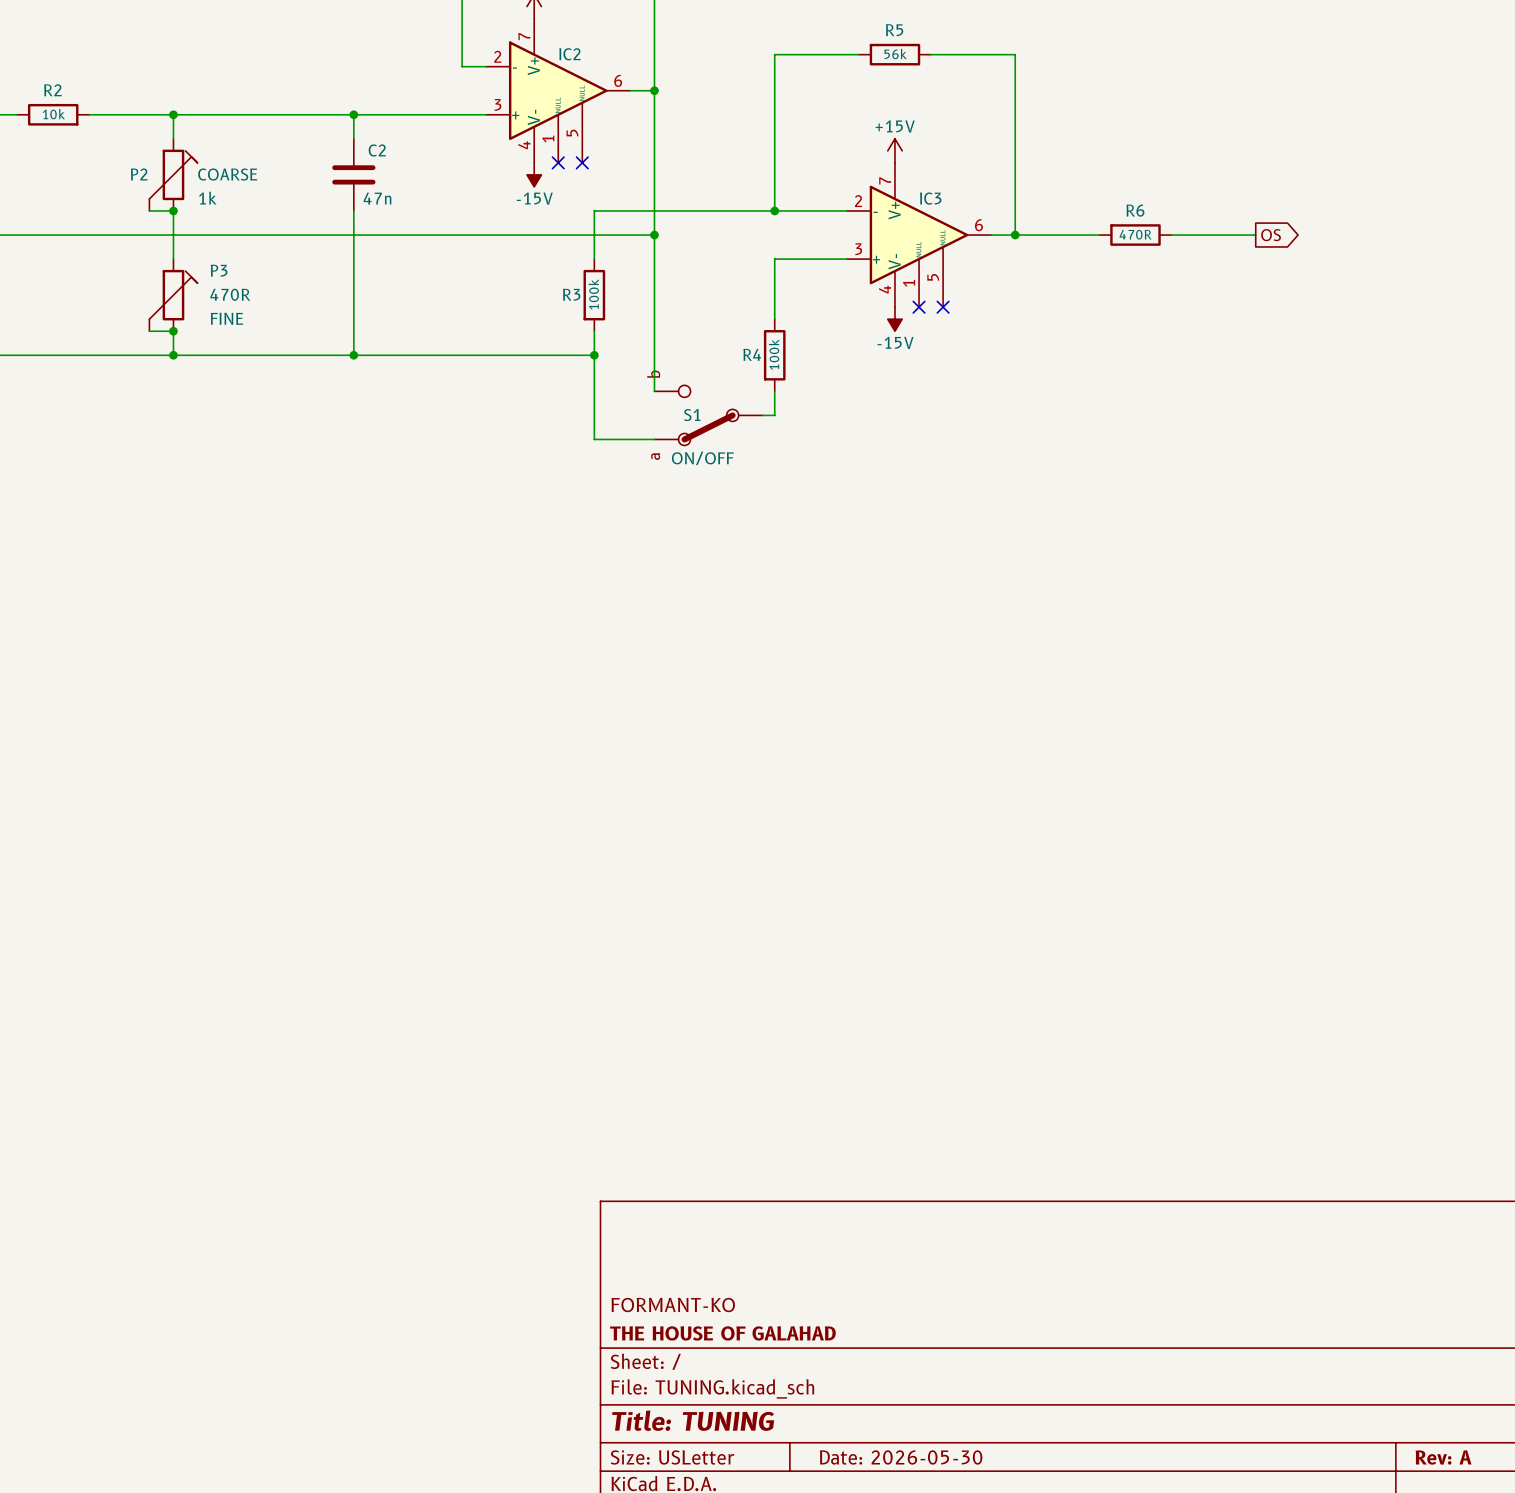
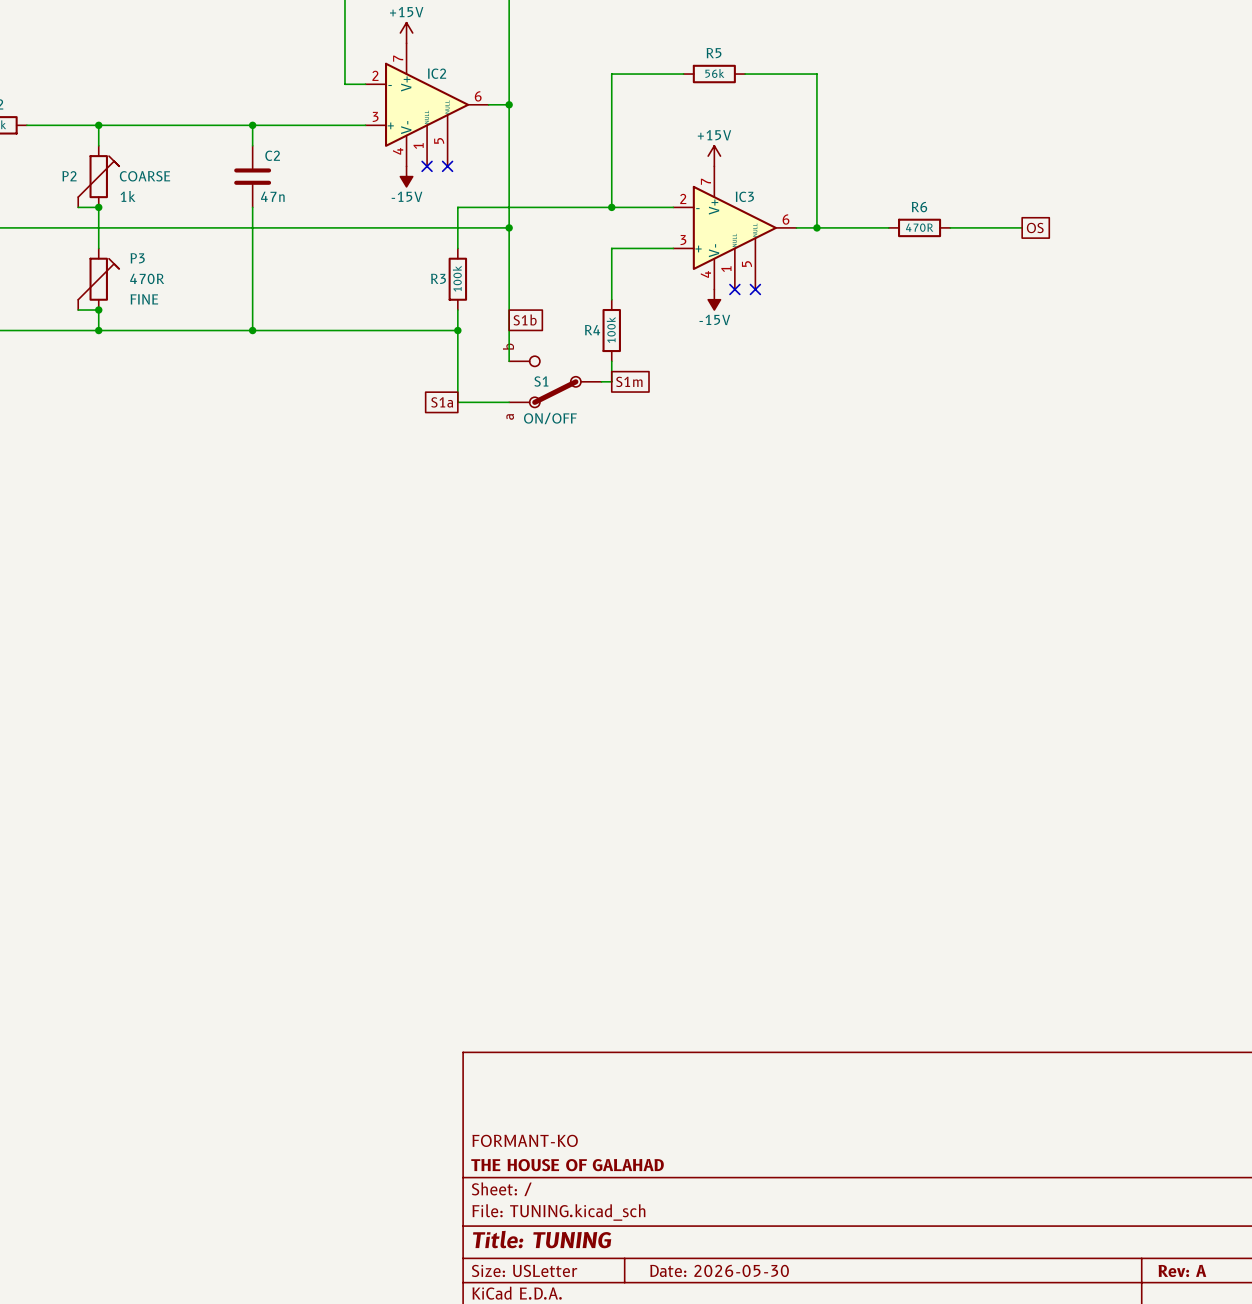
global label shape: output (1271, 235) -> passive (1035, 227)
global label: none -> S1b (525, 319)
global label: none -> S1m (629, 381)
global label: none -> S1a (442, 402)

